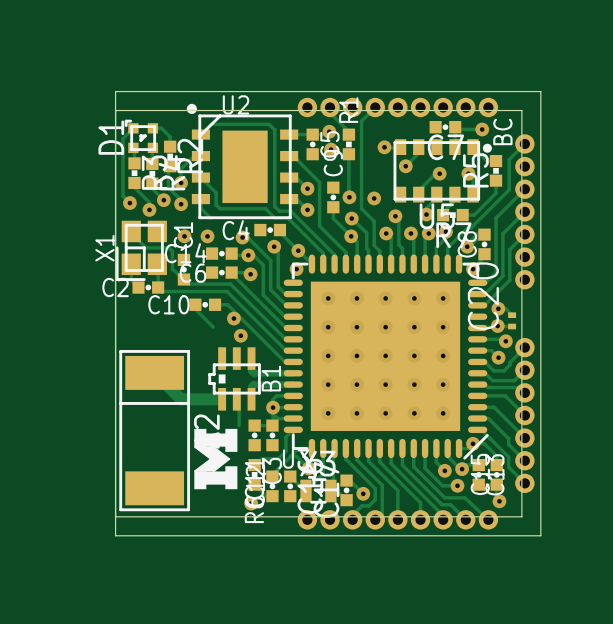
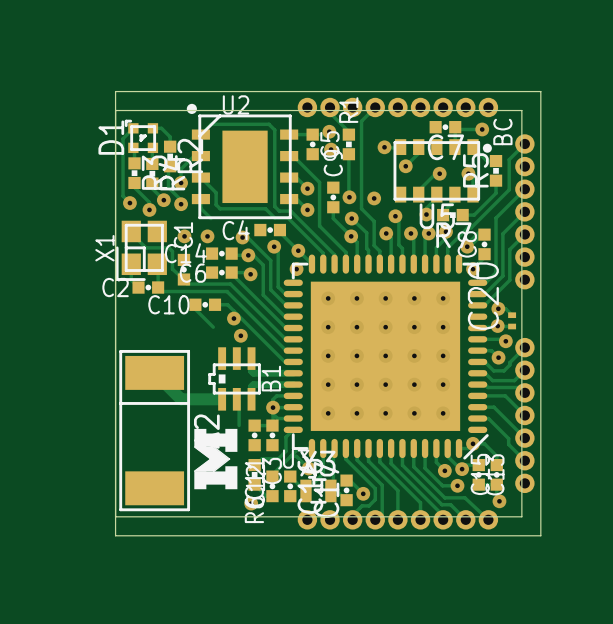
track: (481, 429) (508, 457) (508, 467) (524, 483) (517, 483) -> none

